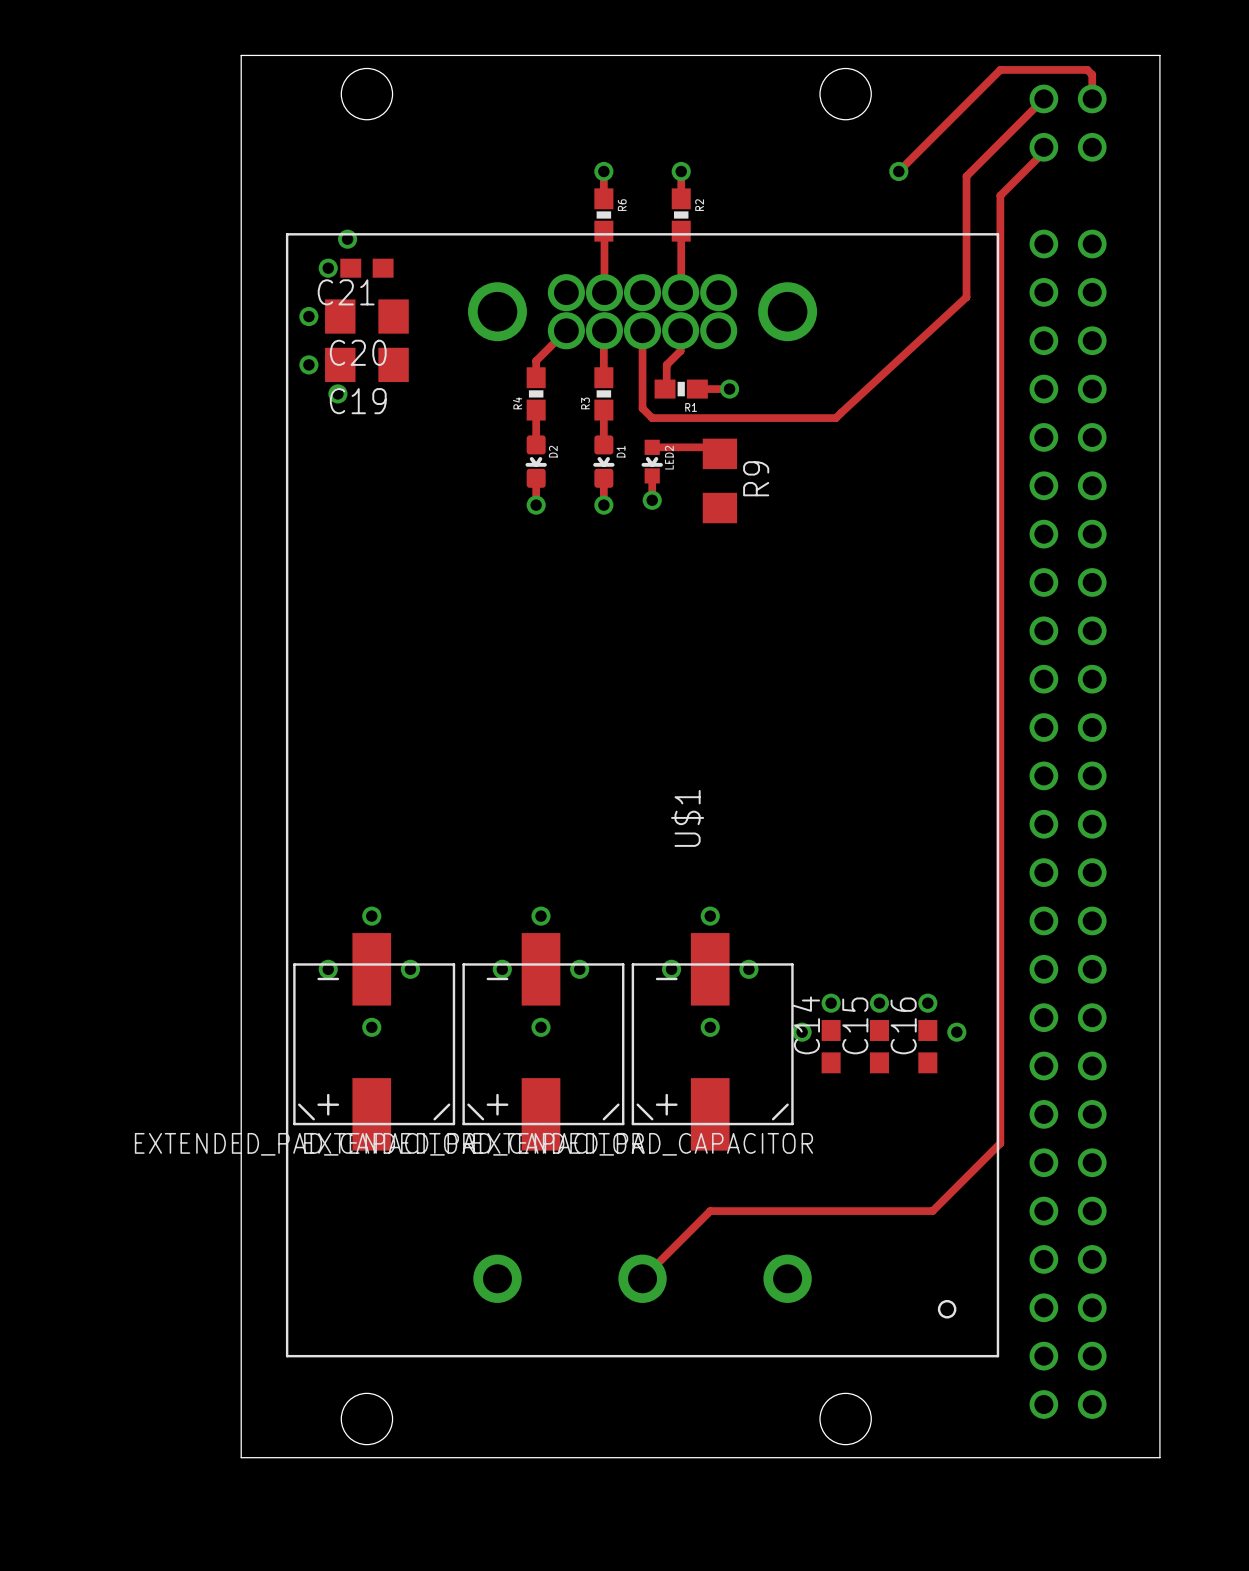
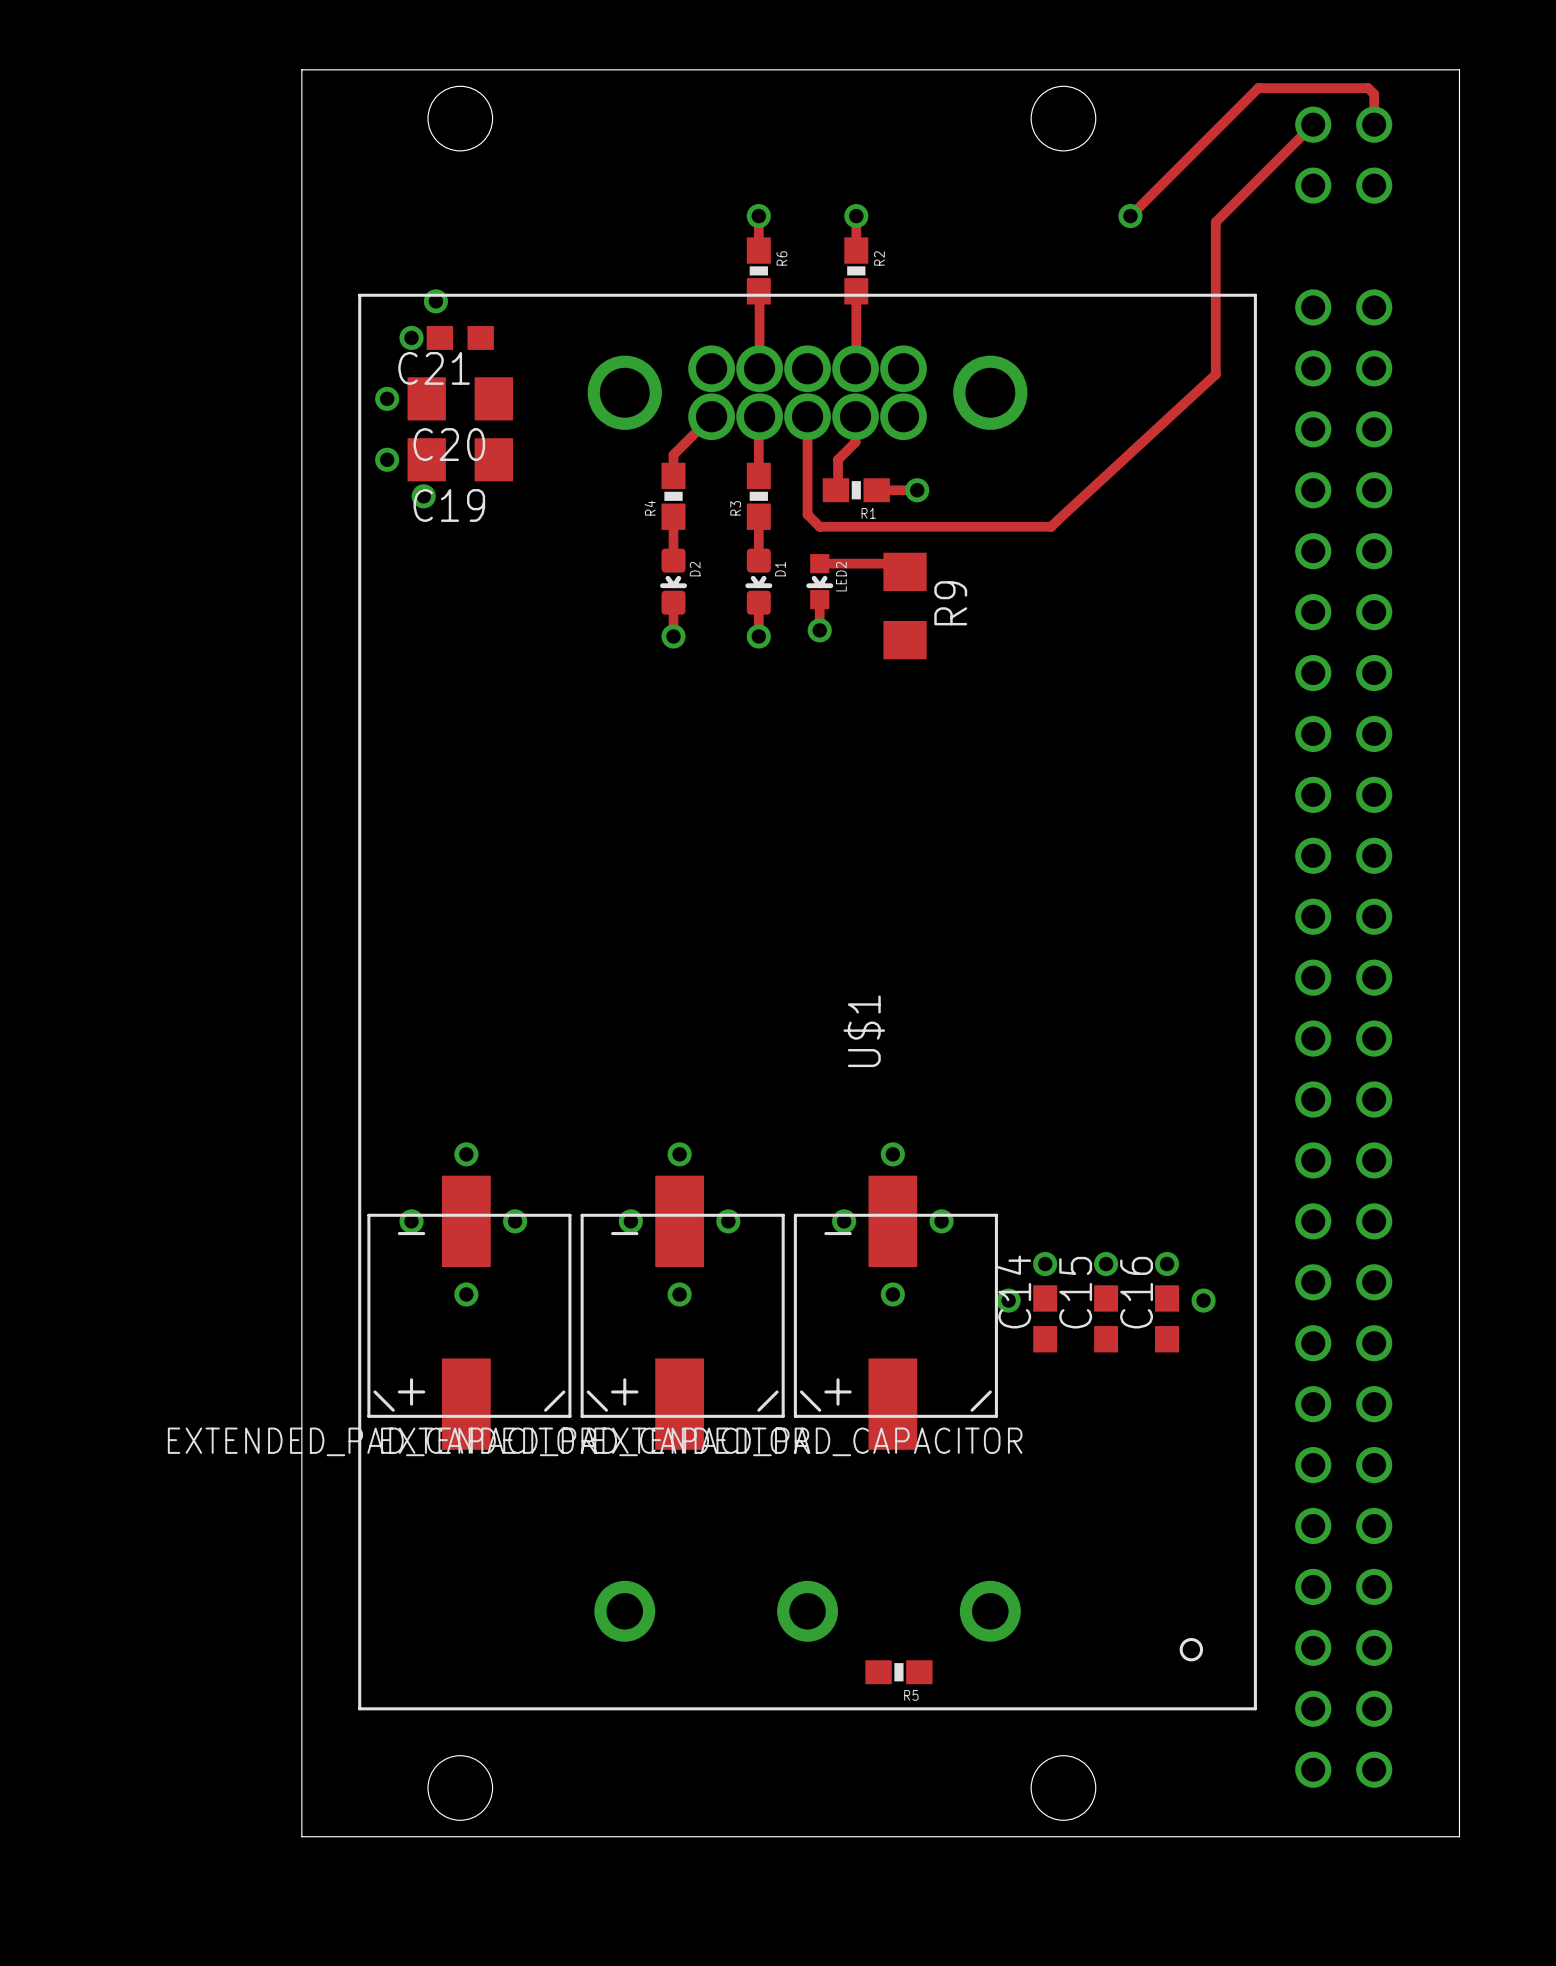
track: (1043, 147) (1043, 152) (1000, 195) (1000, 1143) (932, 1211) (710, 1211) (642, 1278) -> none
R5: none -> (898, 1672)

